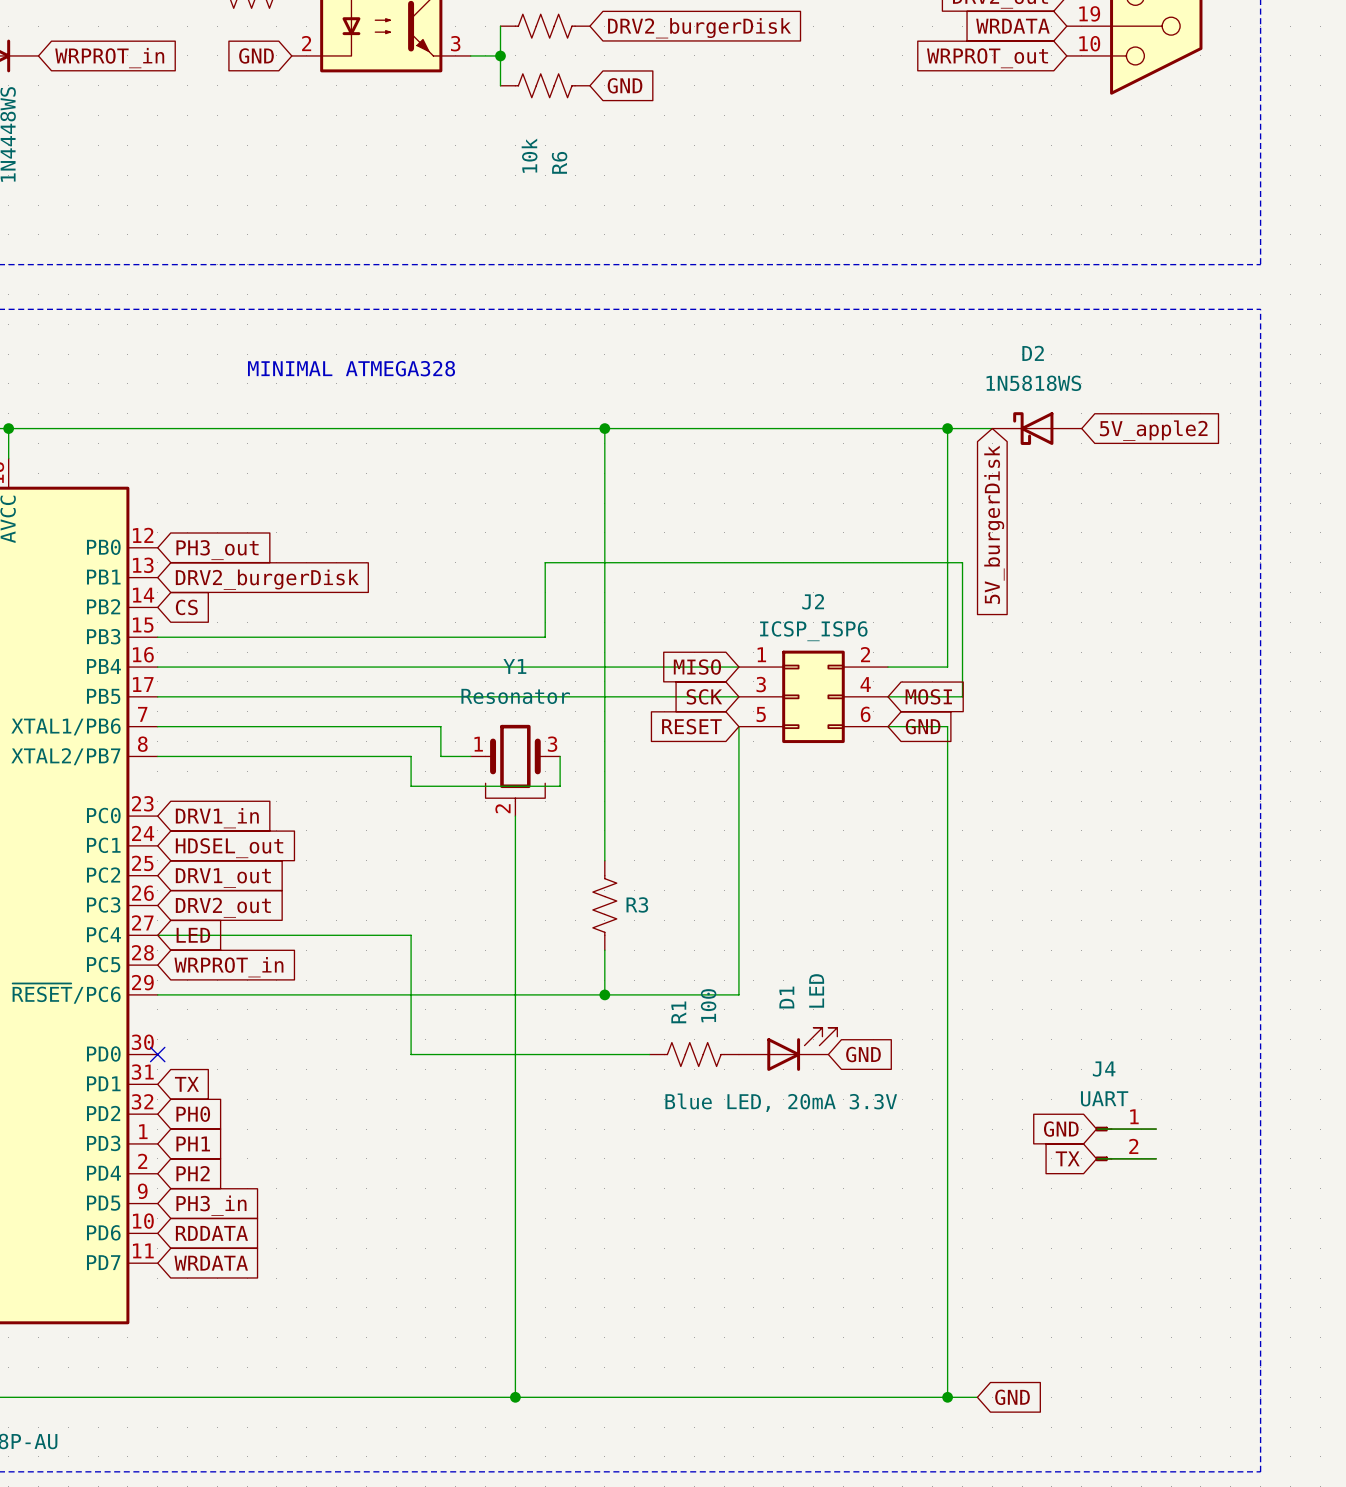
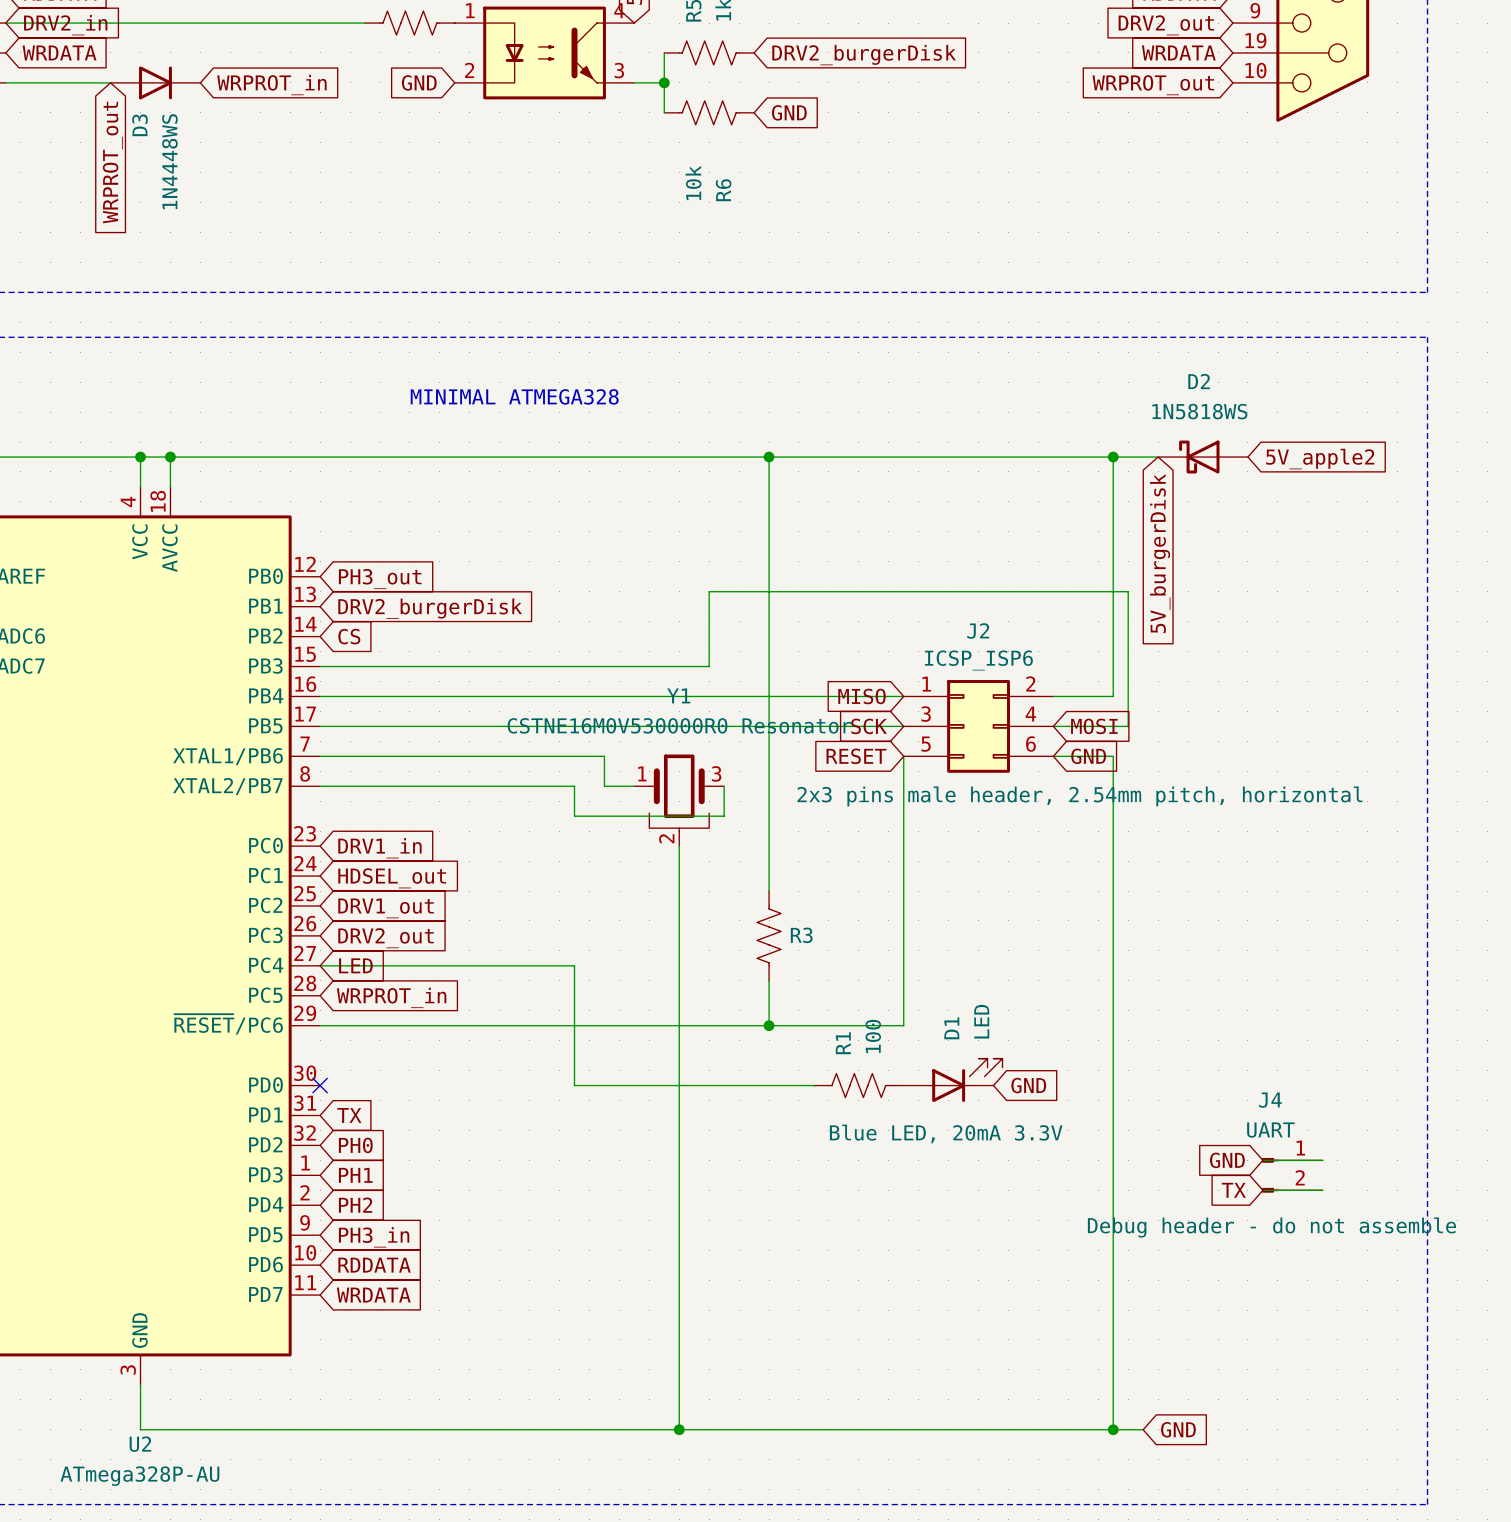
Y1 value: Resonator (515, 696) -> CSTNE16M0V530000R0 Resonator (679, 725)
J2 text: none -> 2x3 pins male header, 2.54mm pitch, horizontal (1080, 796)
J4 text: none -> Debug header - do not assemble (1271, 1227)

